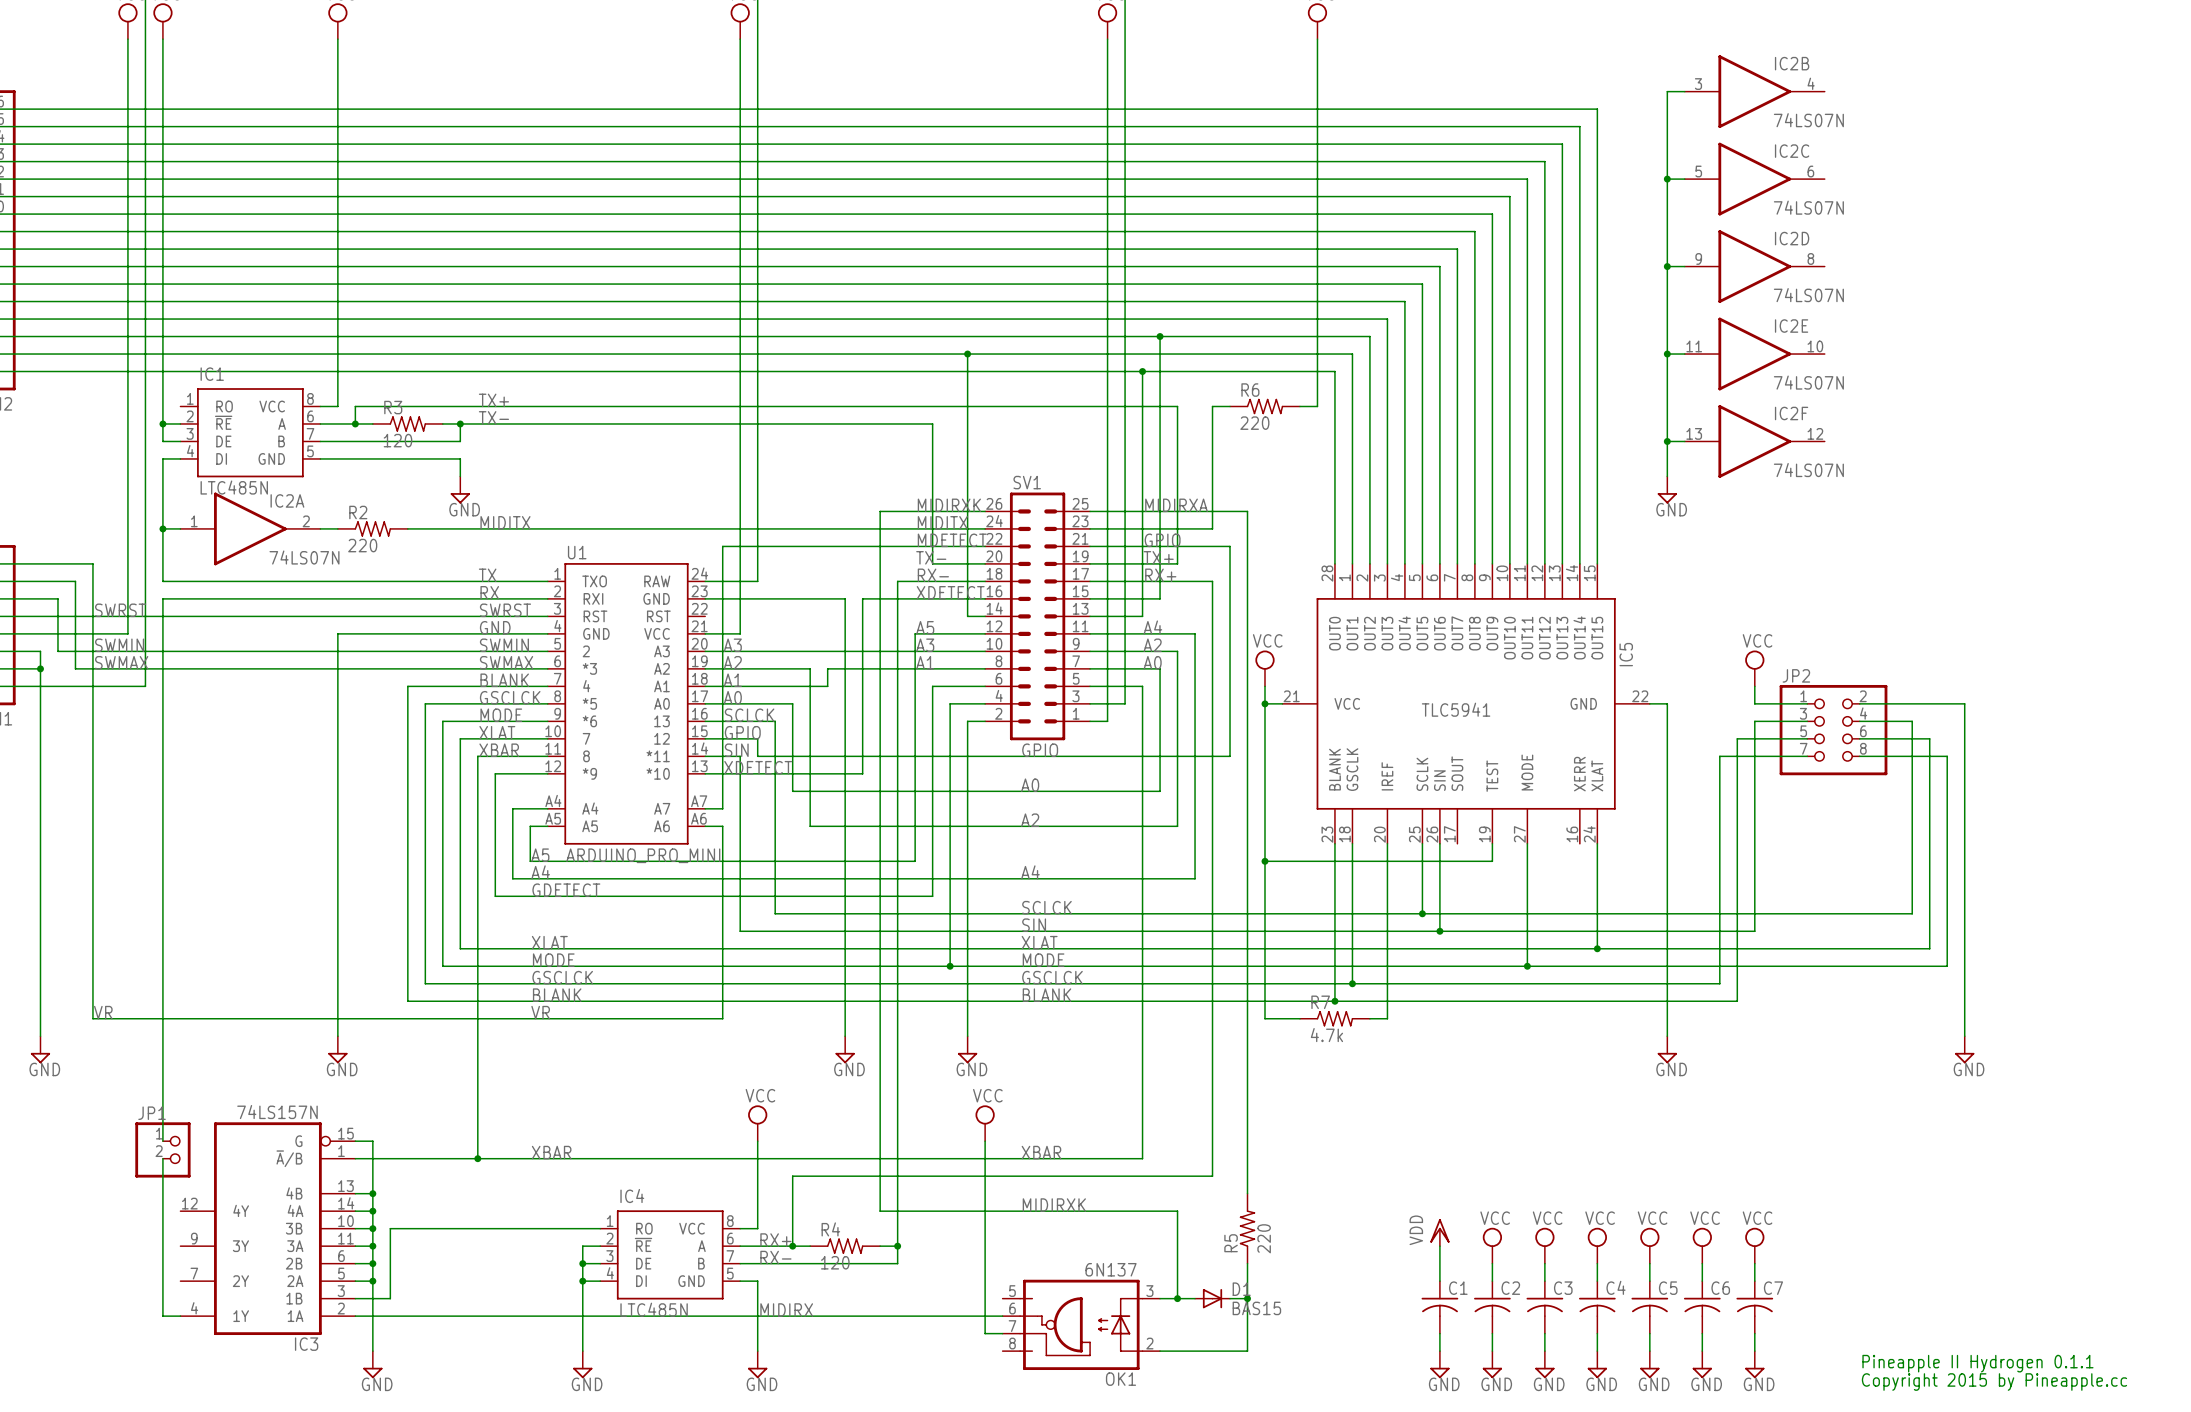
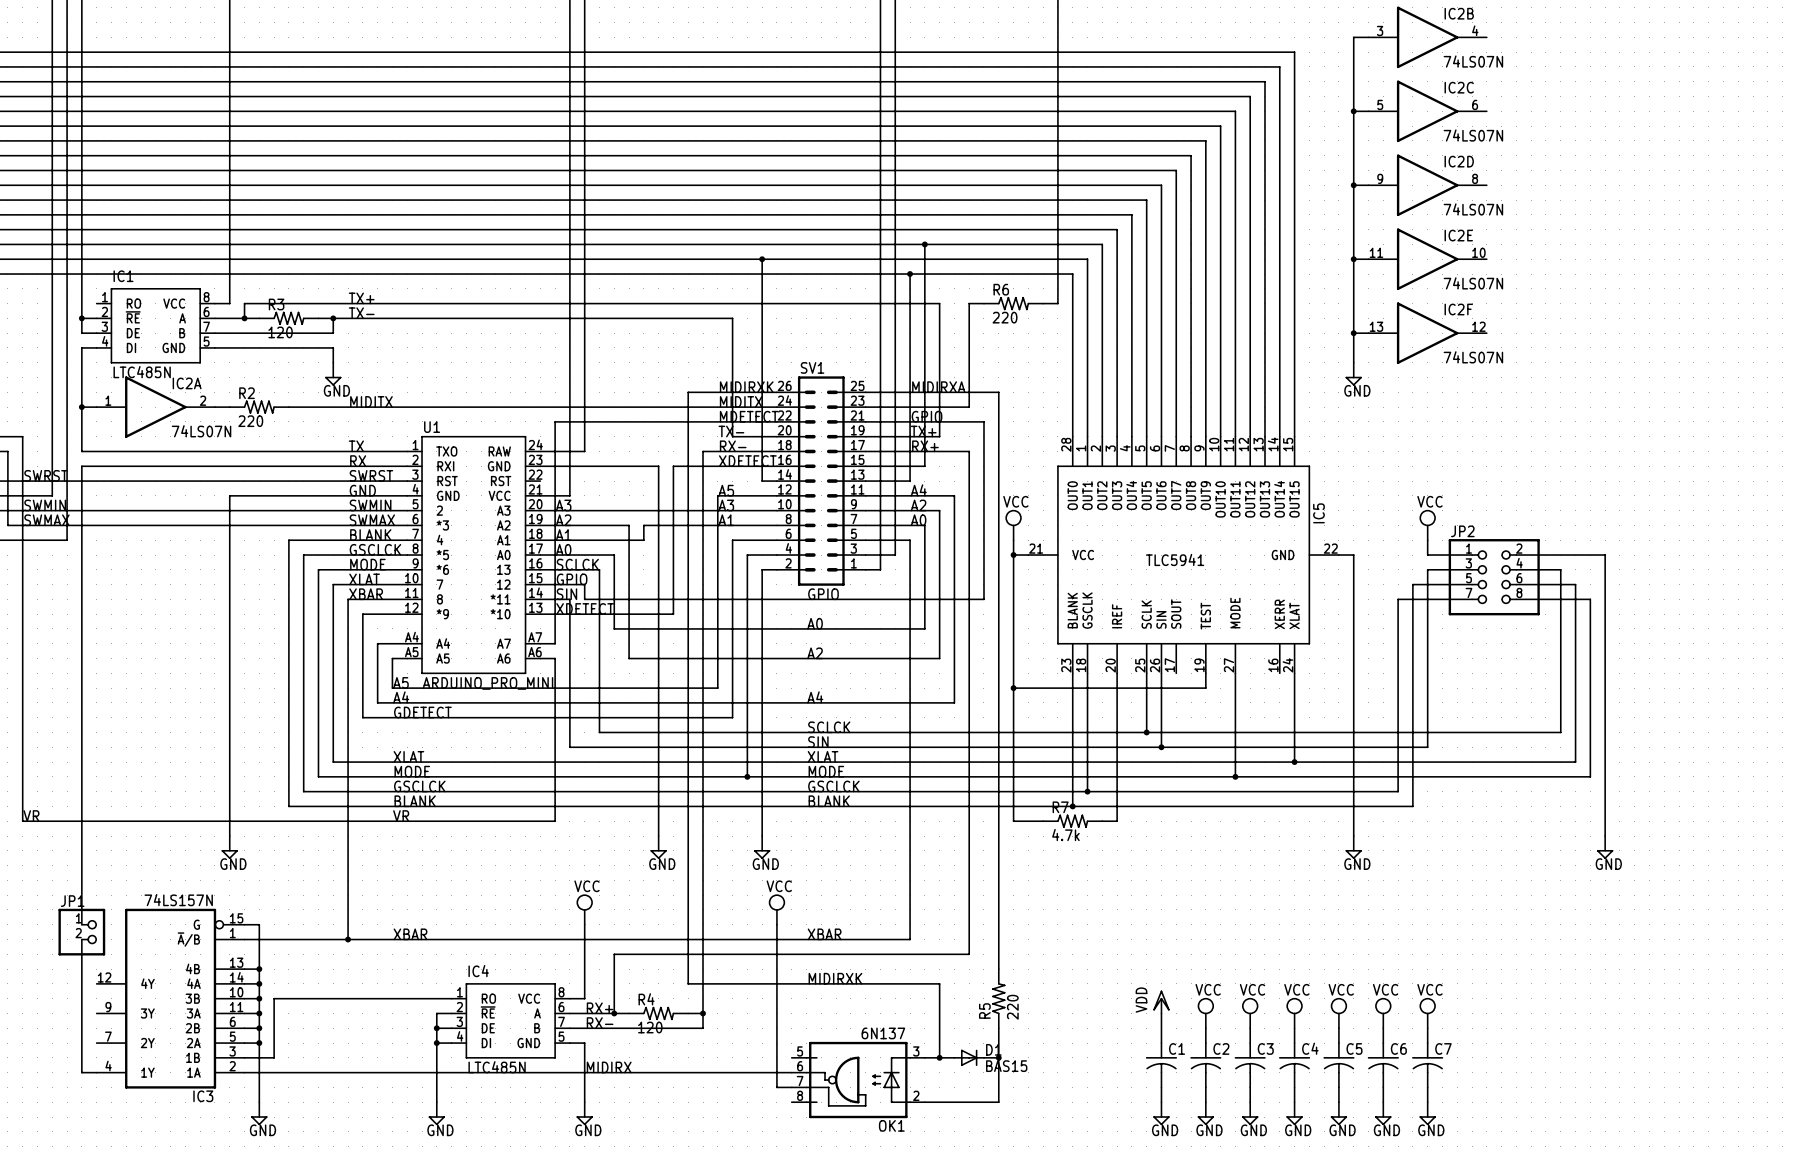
text: Pineapple II Hydrogen 0.1.1 (1977, 1363) -> none
text: Copyright 2015 by Pineapple.cc (1994, 1382) -> none

